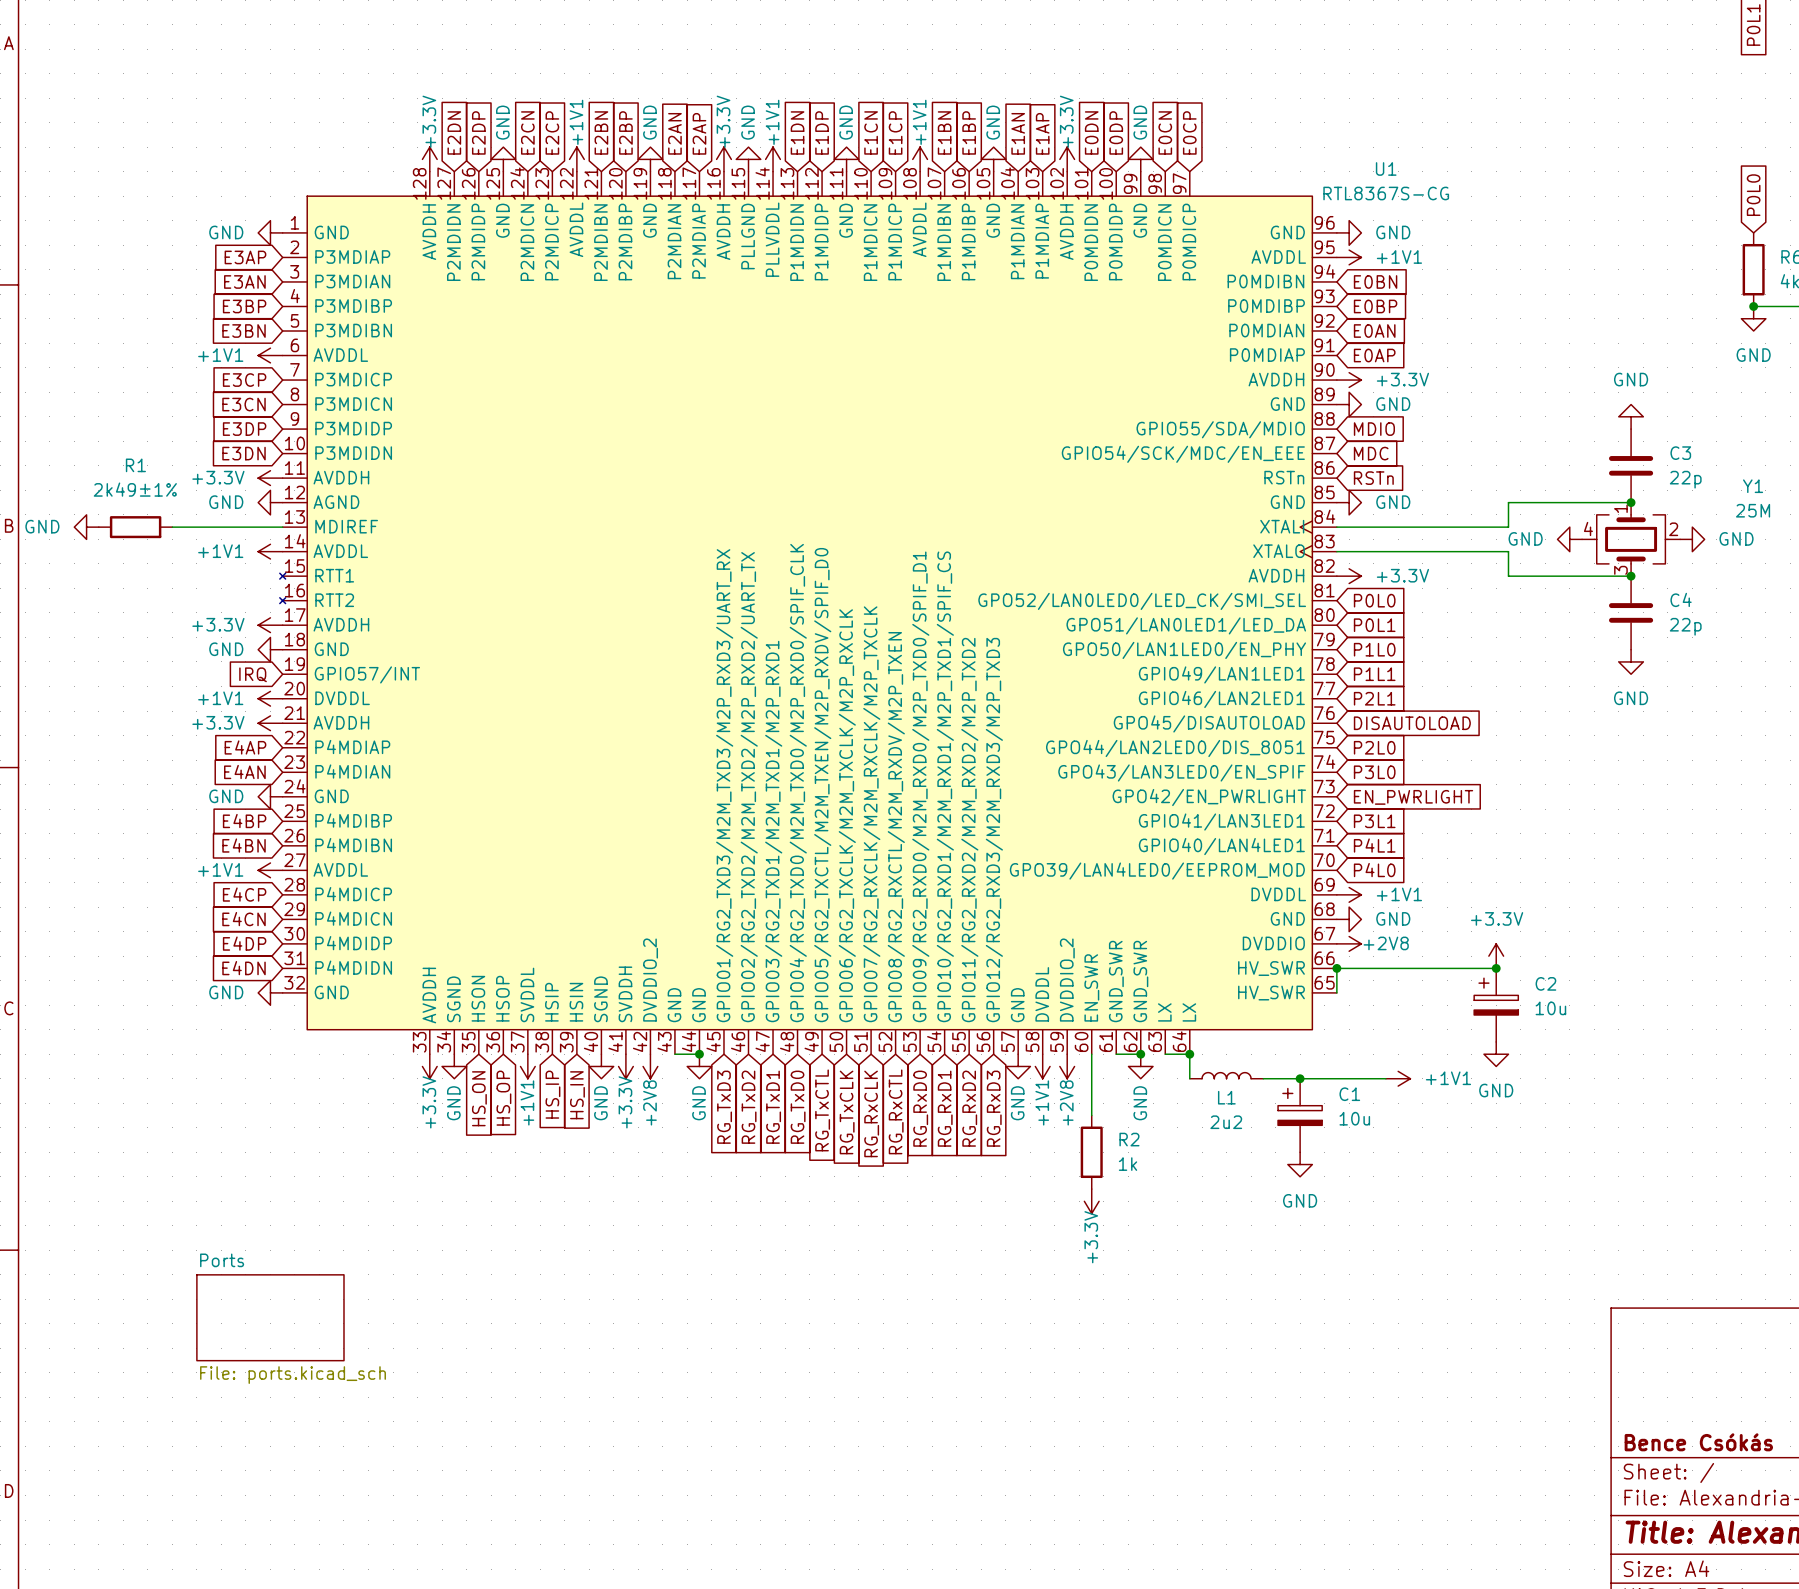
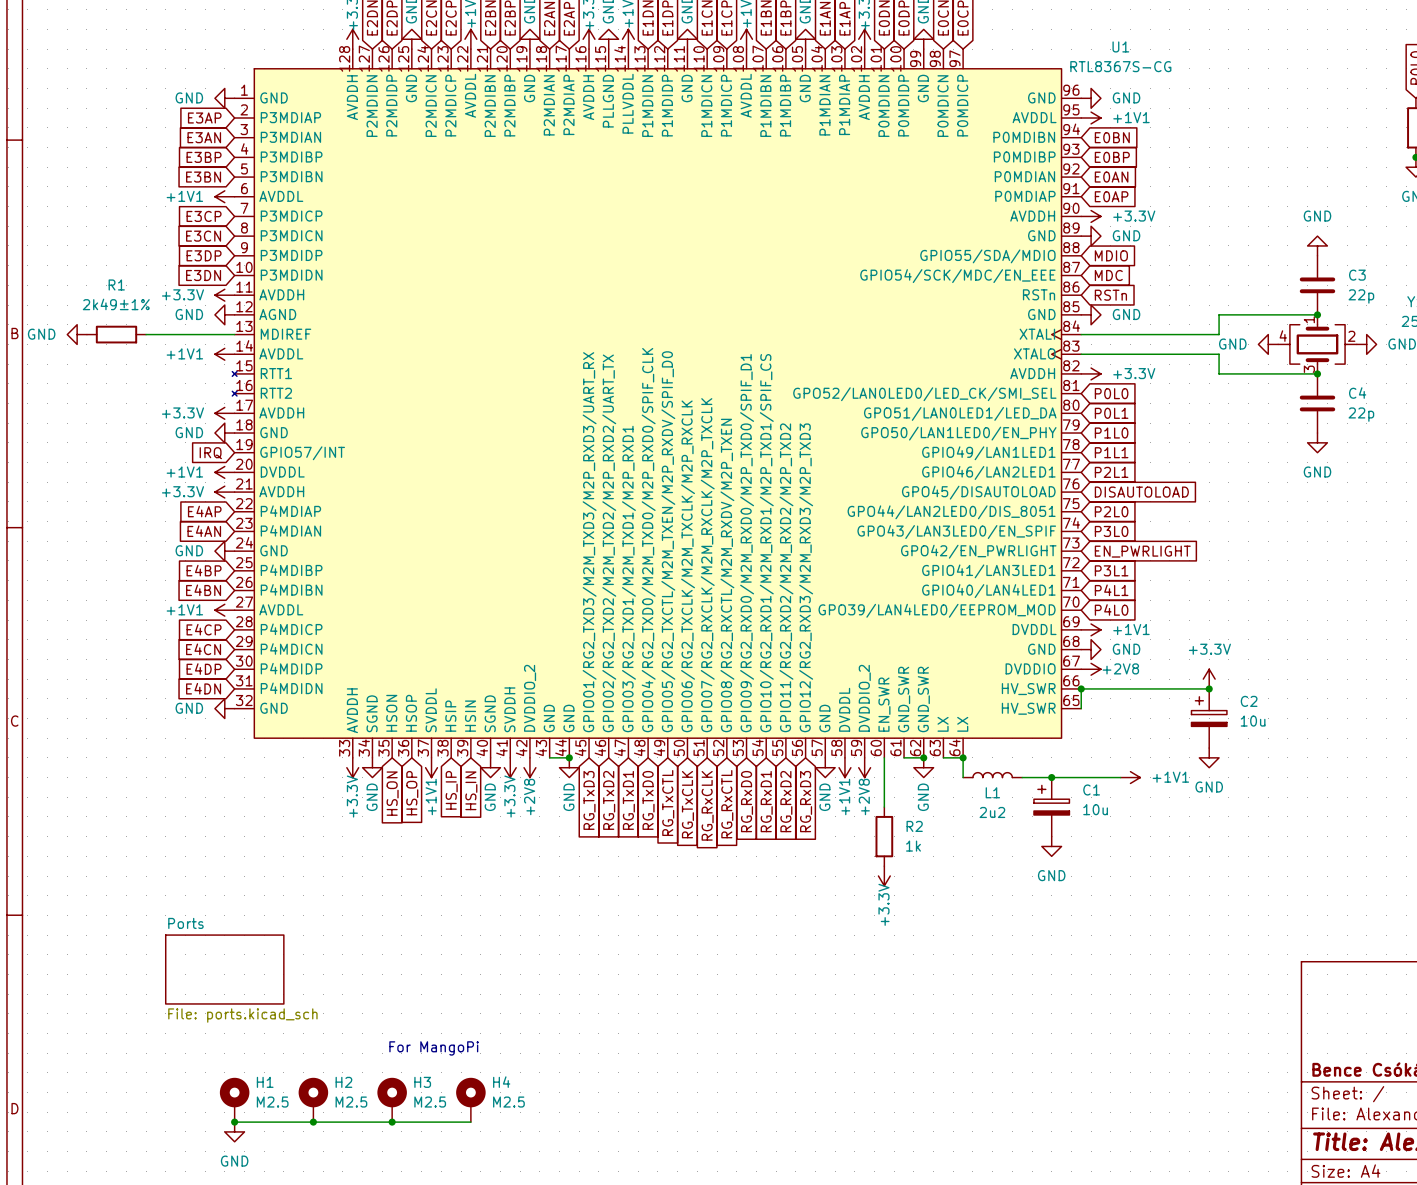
text: none -> For MangoPi (434, 1048)
H1: none -> M2.5 (234, 1099)
H2: none -> M2.5 (313, 1099)
H3: none -> M2.5 (392, 1099)
H4: none -> M2.5 (470, 1099)
wire: none -> (234, 1122) (470, 1122)
junction: none -> (234, 1122)
junction: none -> (313, 1122)
junction: none -> (392, 1122)
power symbol: none -> GND (234, 1131)

